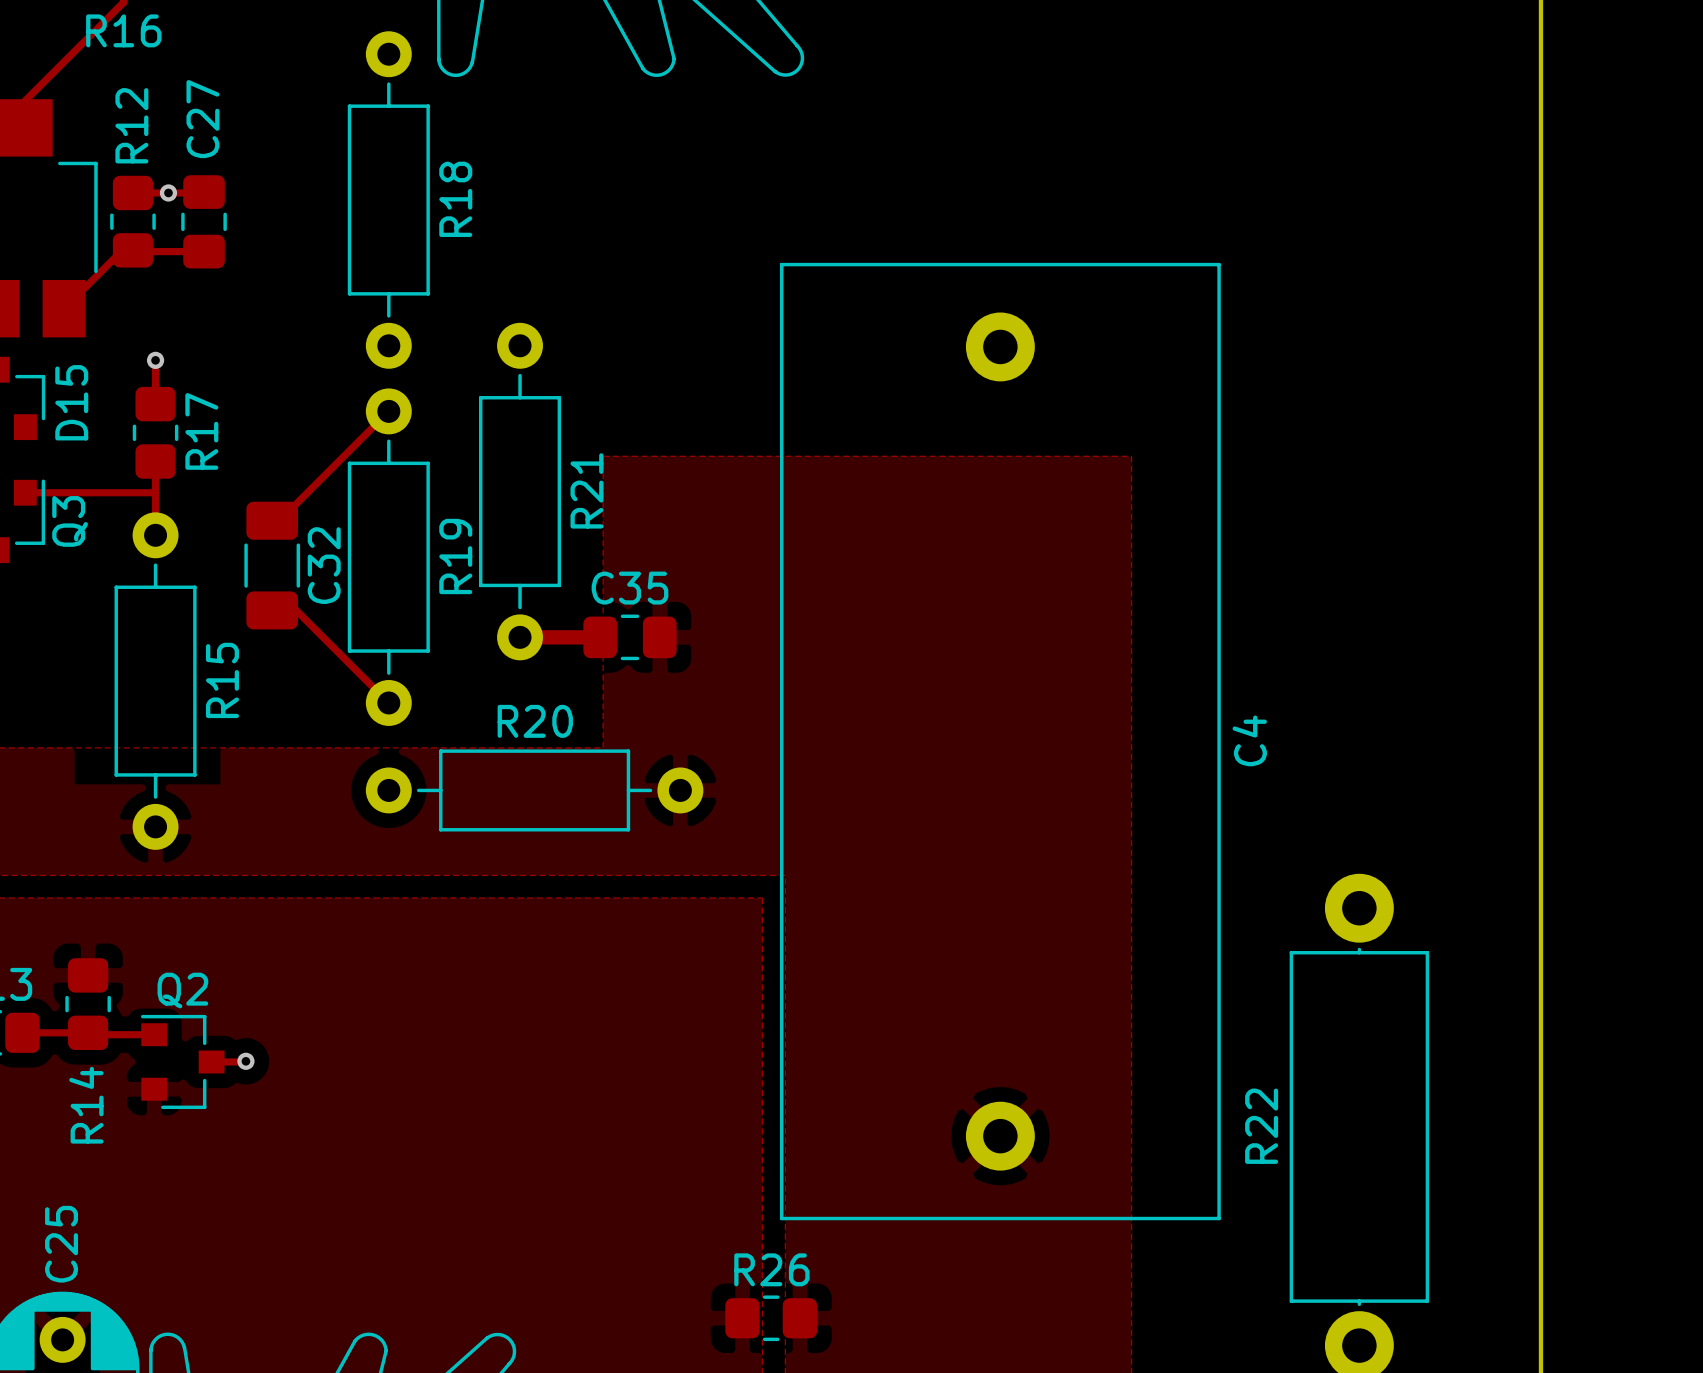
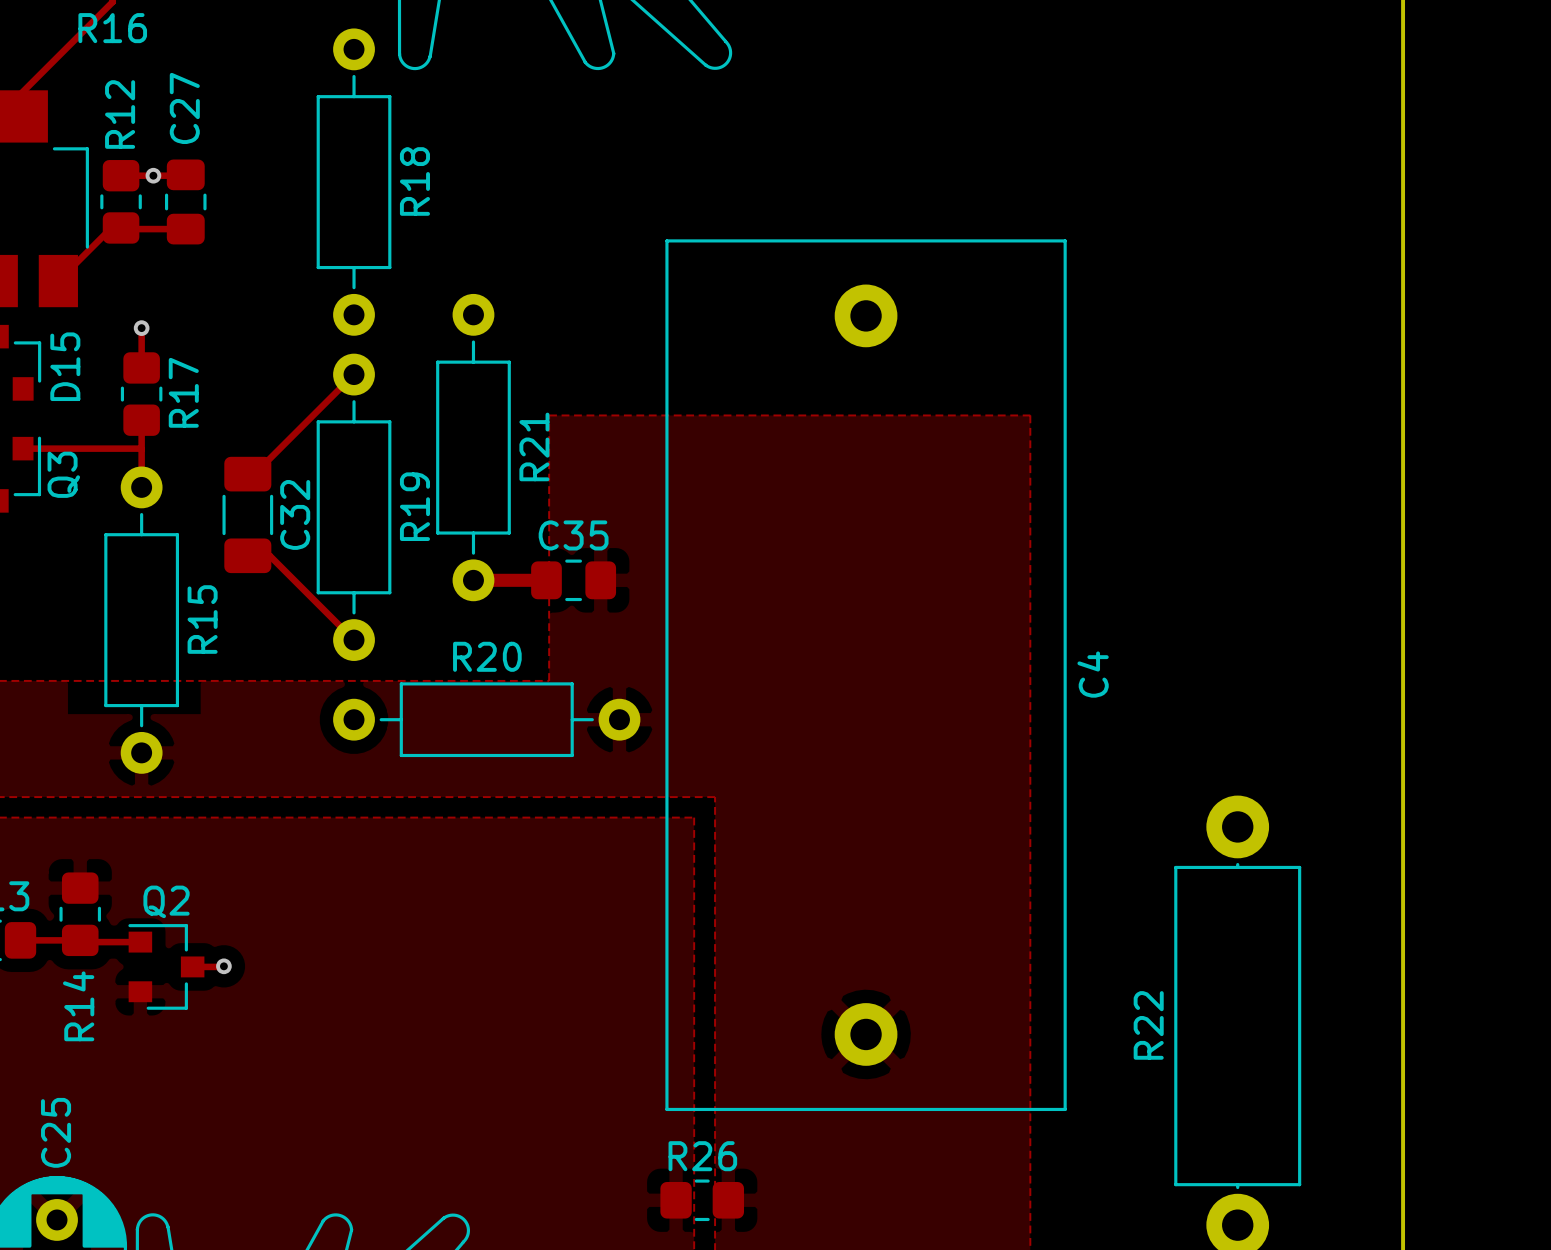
C4 position: (1000, 741) -> (866, 675)

